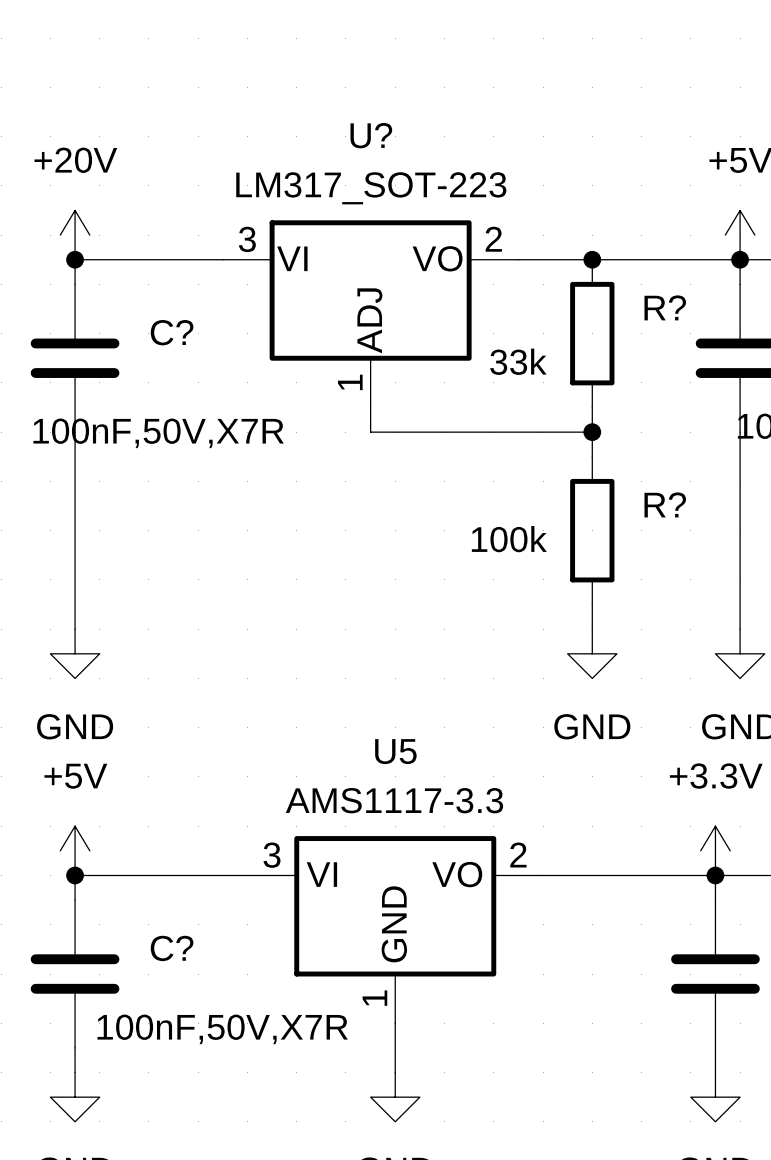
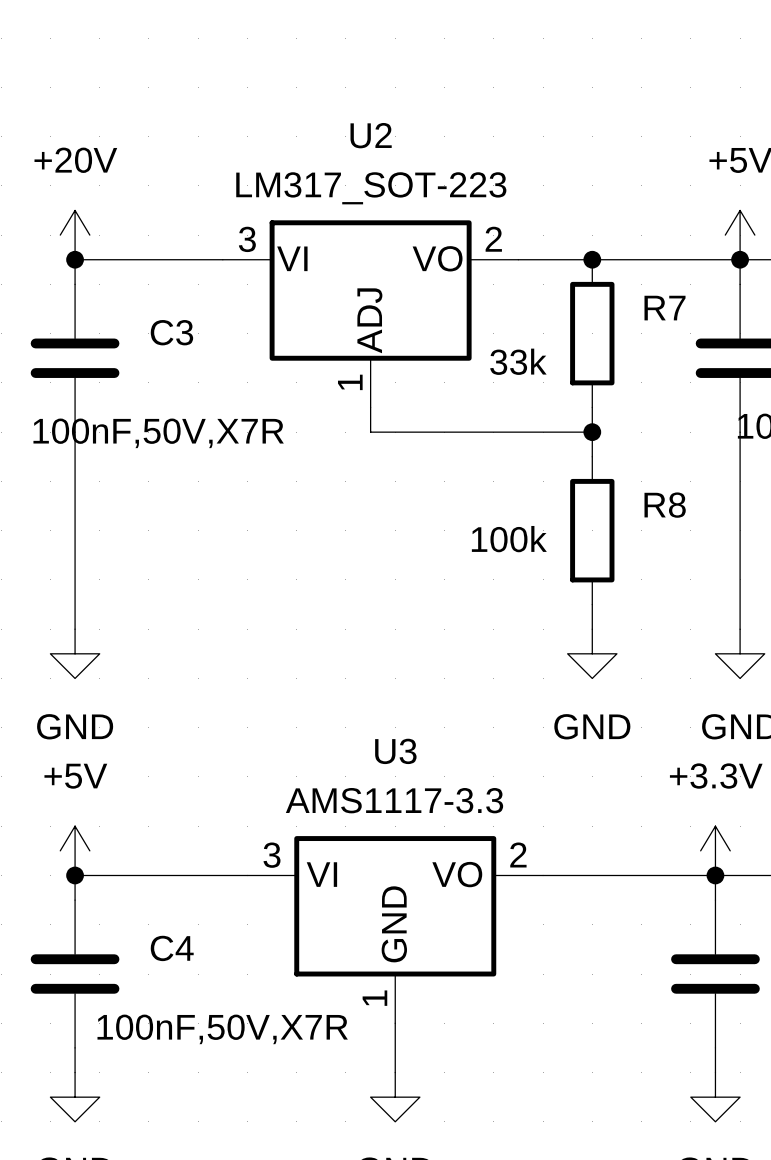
U? name: U? (371, 135) -> U2 (371, 135)
R? name: R? (665, 307) -> R7 (665, 308)
C? name: C? (172, 332) -> C3 (171, 332)
R? name: R? (665, 504) -> R8 (665, 505)
U5 name: U5 (395, 751) -> U3 (395, 751)
C? name: C? (172, 948) -> C4 (172, 948)

